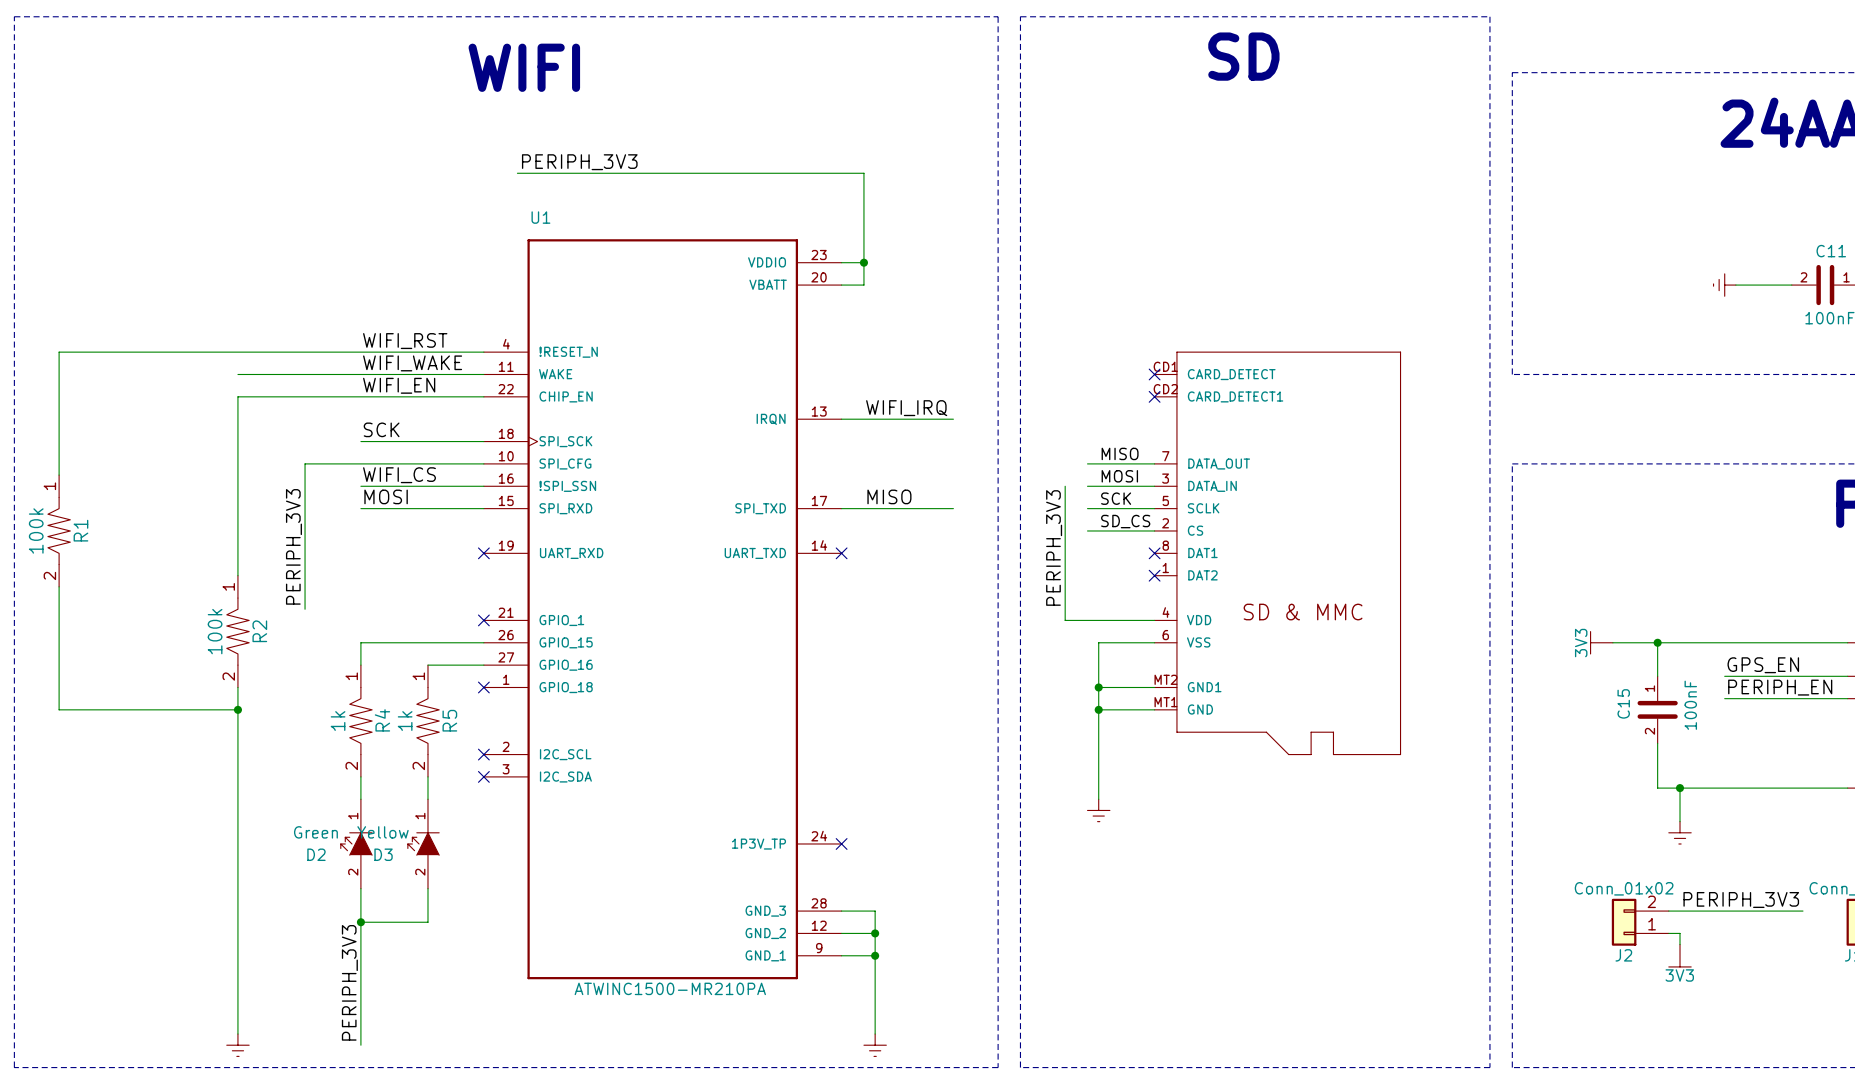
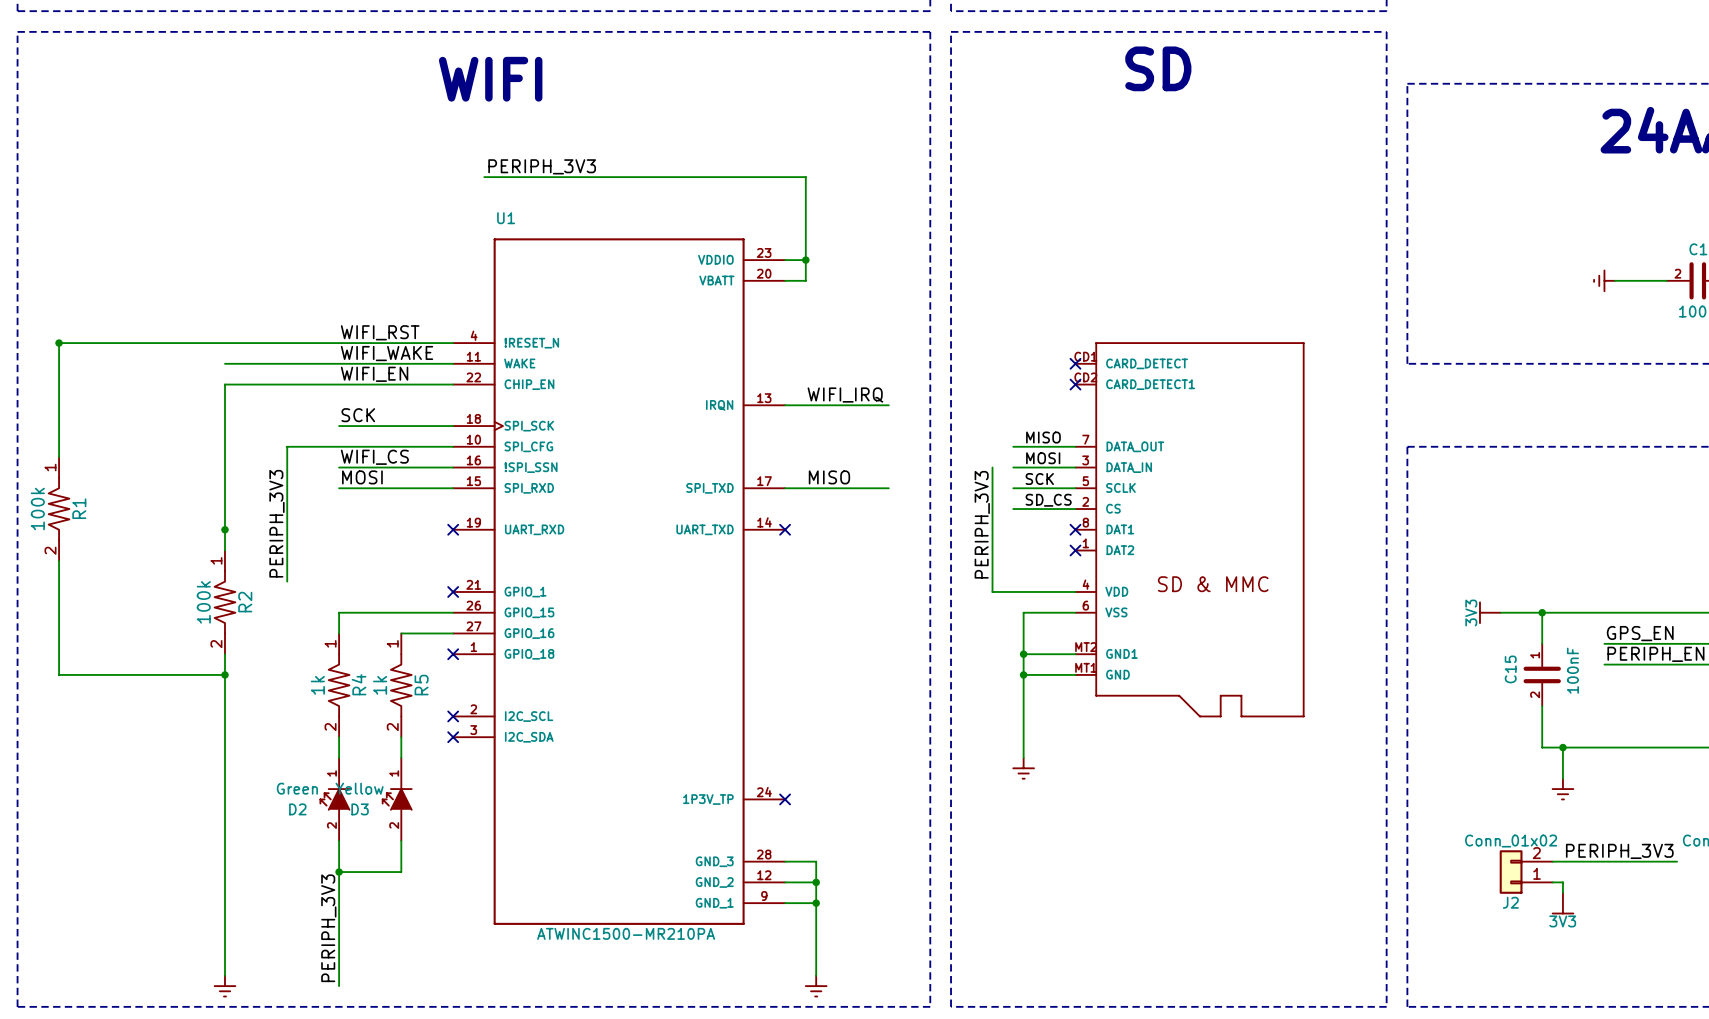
junction: none -> (59, 343)
junction: none -> (224, 529)

